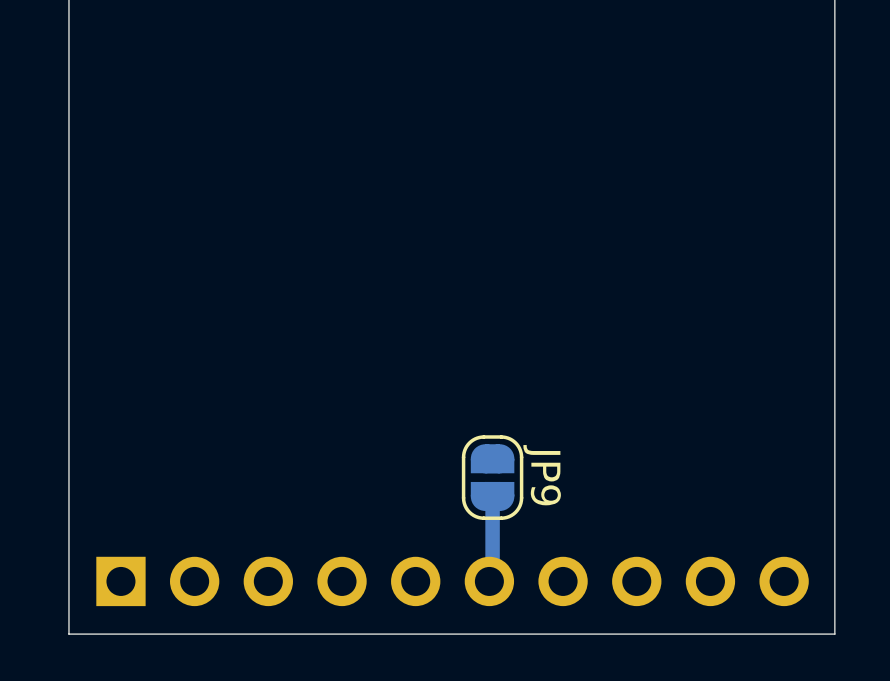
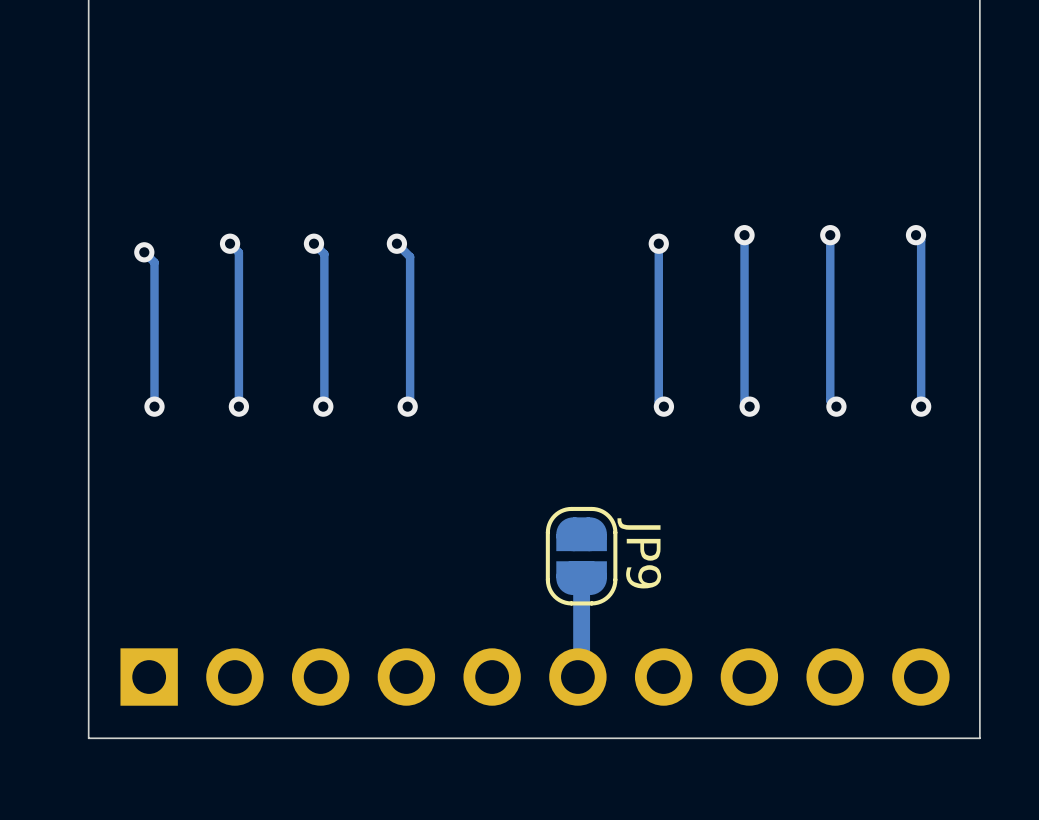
track: none -> (744, 235) (744, 401) (749, 406)
via: none -> (744, 235)
track: none -> (830, 235) (830, 400) (836, 406)
via: none -> (830, 235)
track: none -> (916, 235) (921, 240) (921, 406)
via: none -> (916, 235)
track: none -> (230, 243) (238, 252) (238, 406)
via: none -> (230, 243)
track: none -> (313, 243) (324, 254) (323, 406)
via: none -> (313, 243)
track: none -> (396, 243) (410, 256) (410, 404) (407, 406)
via: none -> (396, 243)
track: none -> (658, 243) (658, 401) (663, 406)
via: none -> (658, 243)
track: none -> (144, 252) (154, 262) (154, 406)
via: none -> (144, 252)
via: none -> (154, 406)
via: none -> (238, 406)
via: none -> (323, 406)
via: none -> (407, 406)
via: none -> (663, 406)
via: none -> (749, 406)
via: none -> (836, 406)
via: none -> (921, 406)

